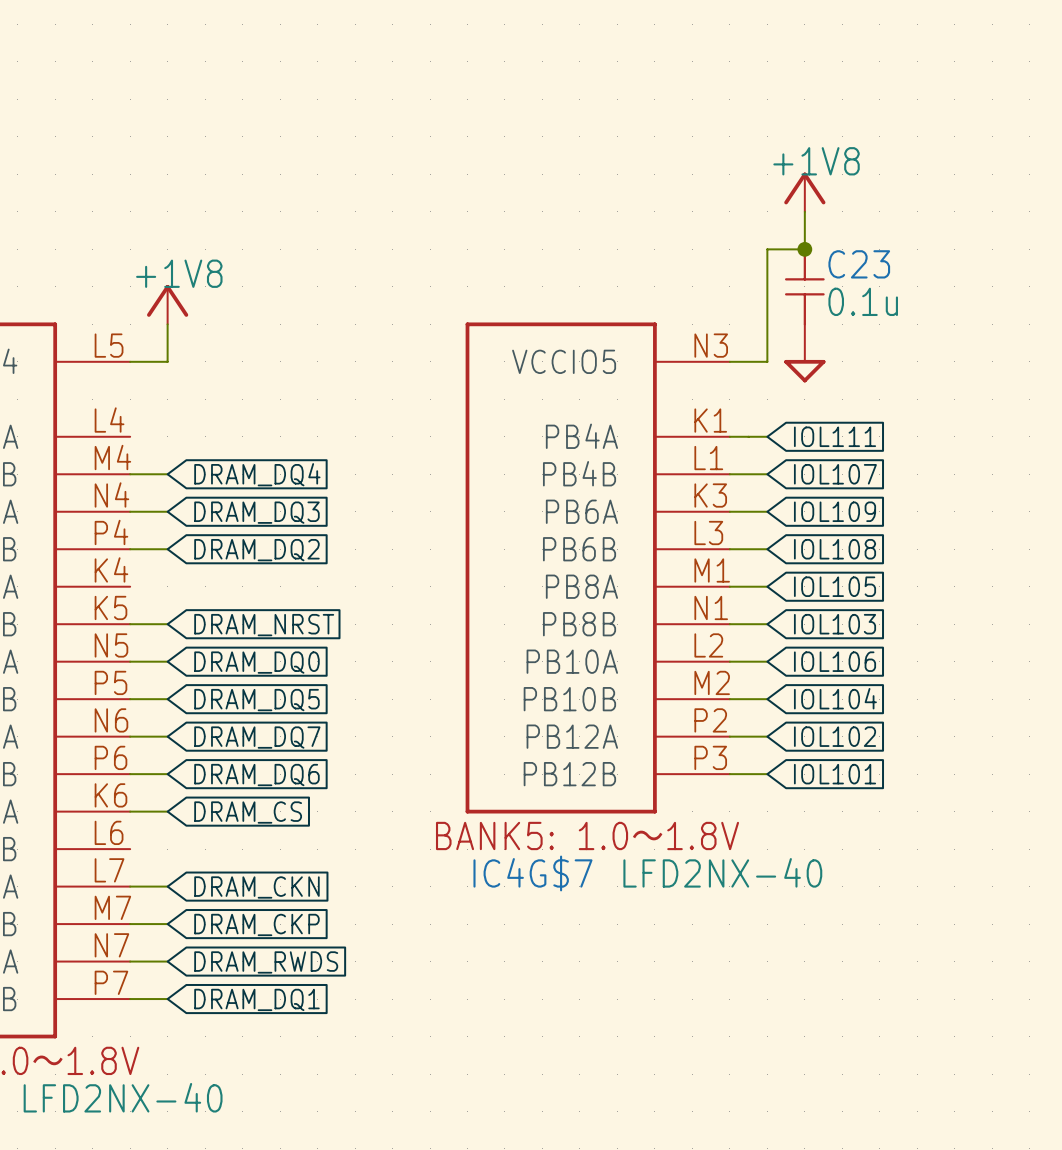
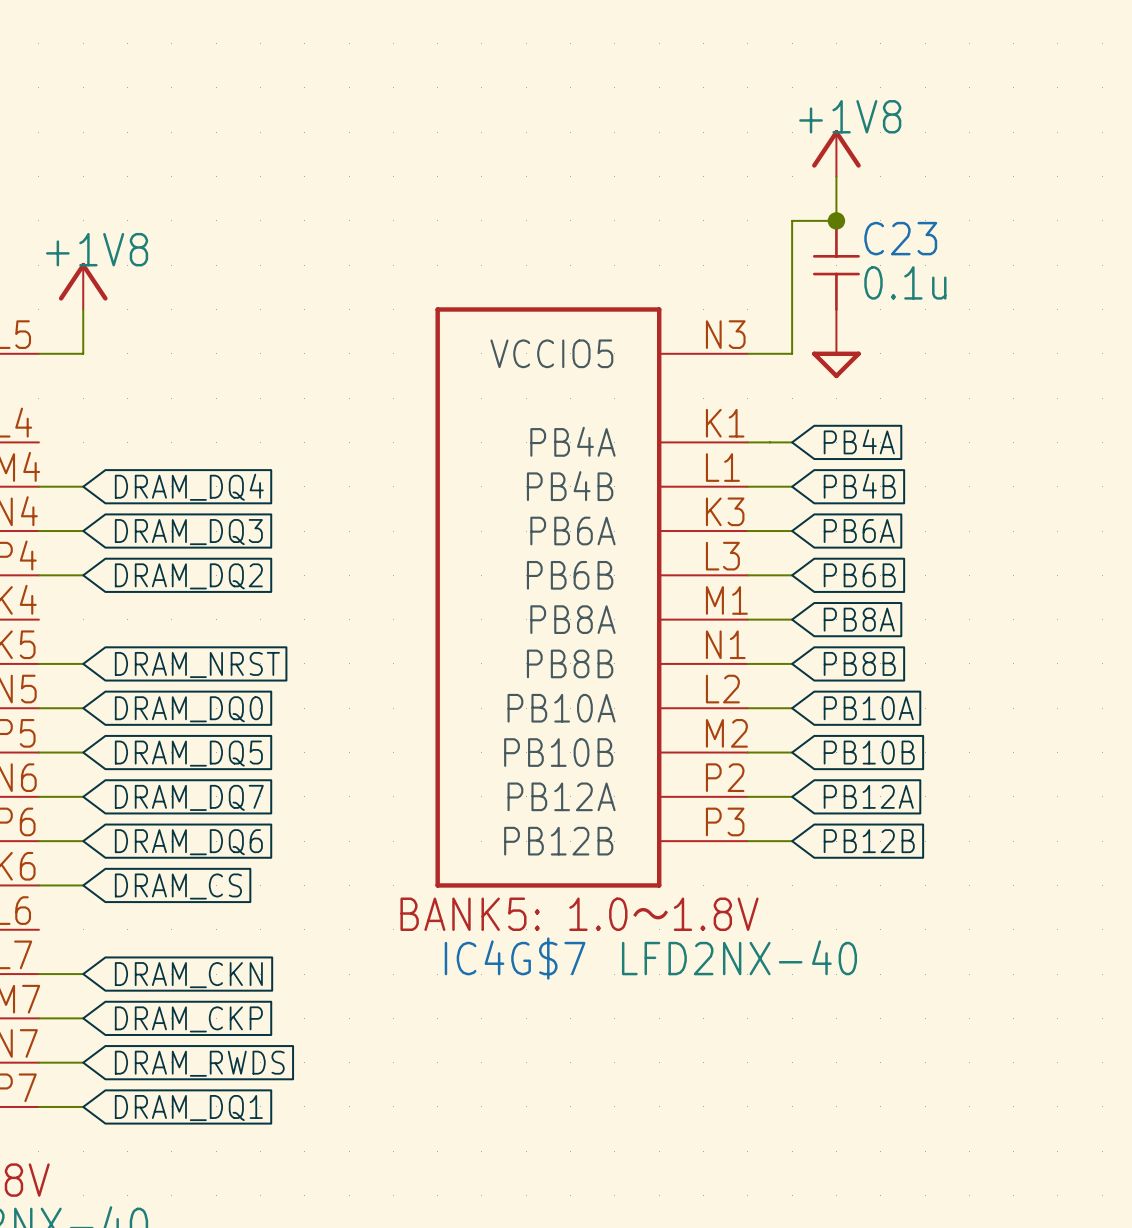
global label: IOL111 (835, 436) -> PB4A (859, 441)
global label: IOL107 (835, 474) -> PB4B (859, 486)
global label: IOL109 (835, 511) -> PB6A (859, 531)
global label: IOL108 (835, 549) -> PB6B (859, 575)
global label: IOL105 (835, 586) -> PB8A (859, 619)
global label: IOL103 (835, 624) -> PB8B (859, 663)
global label: IOL106 (835, 661) -> PB10A (868, 708)
global label: IOL104 (835, 698) -> PB10B (869, 752)
global label: IOL102 (835, 736) -> PB12A (868, 796)
global label: IOL101 (835, 774) -> PB12B (869, 841)

